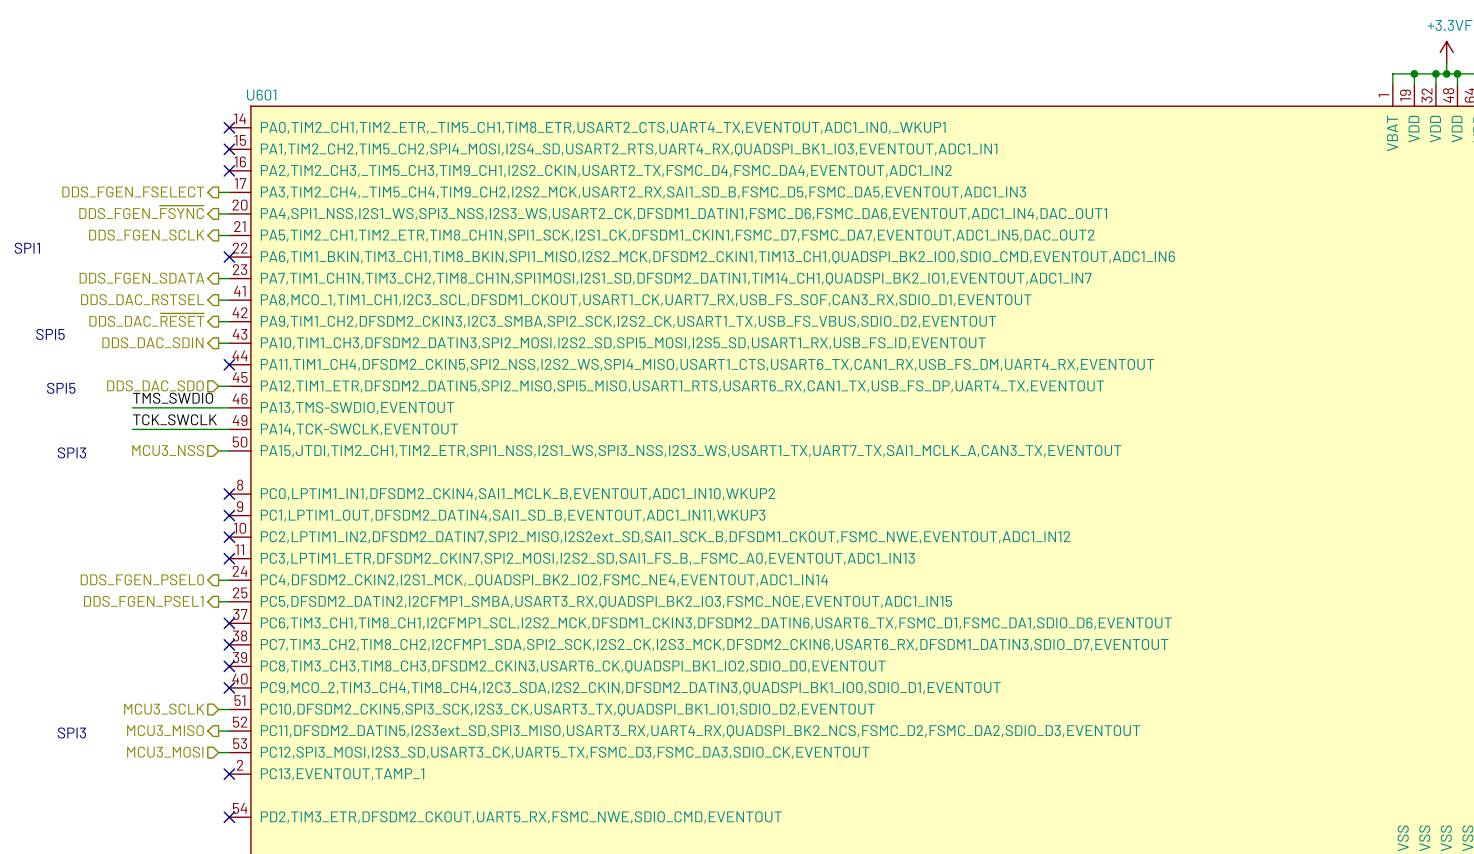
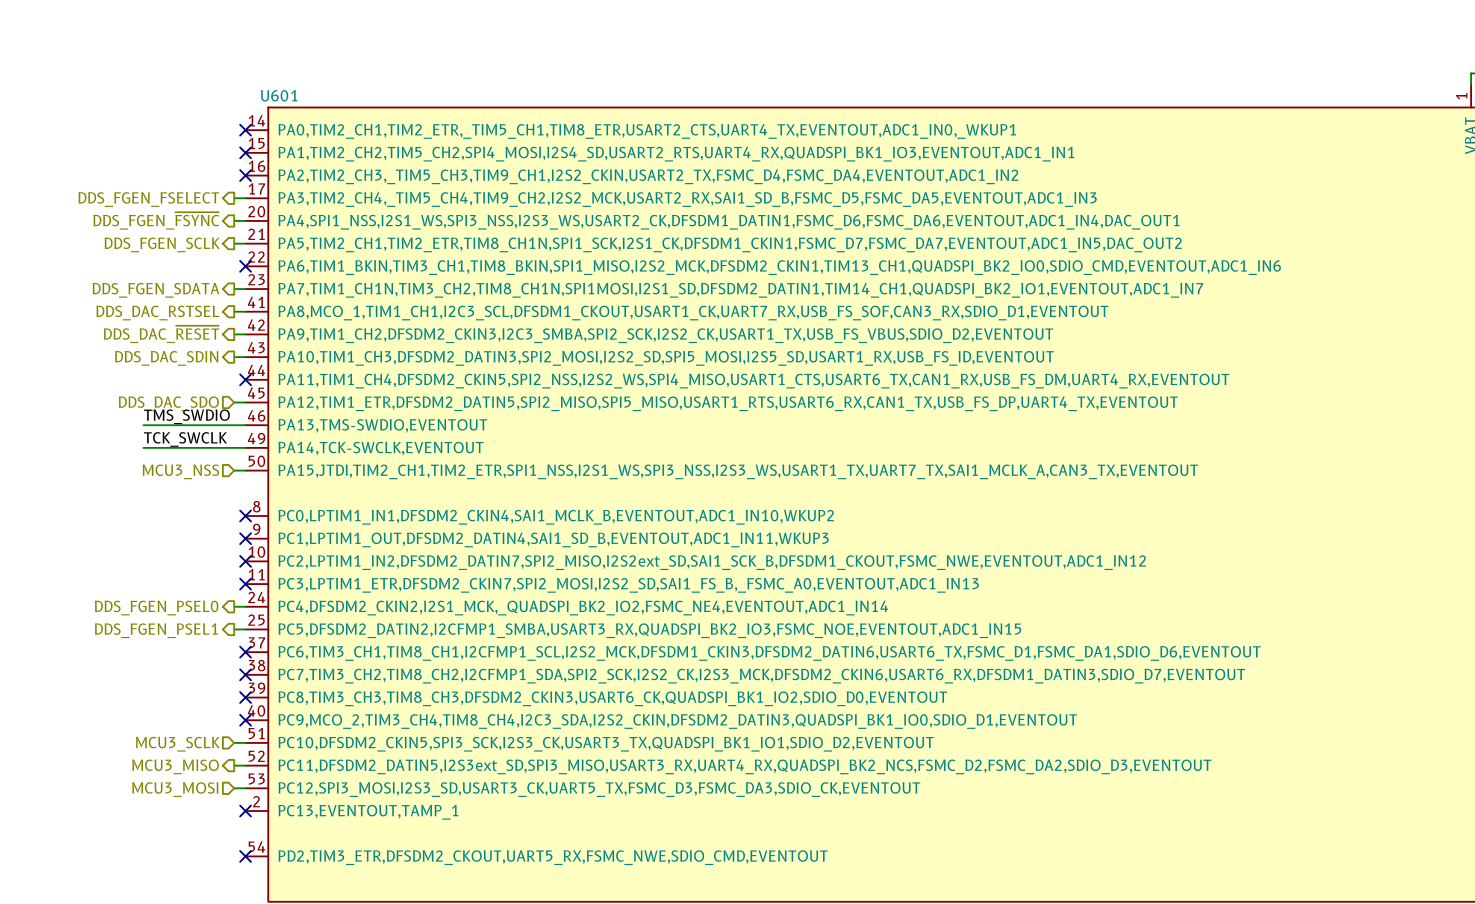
text: SPI1 (27, 248) -> none
text: SPI5 (50, 334) -> none
text: SPI5 (61, 388) -> none
text: SPI3 (71, 452) -> none
text: SPI3 (71, 732) -> none

